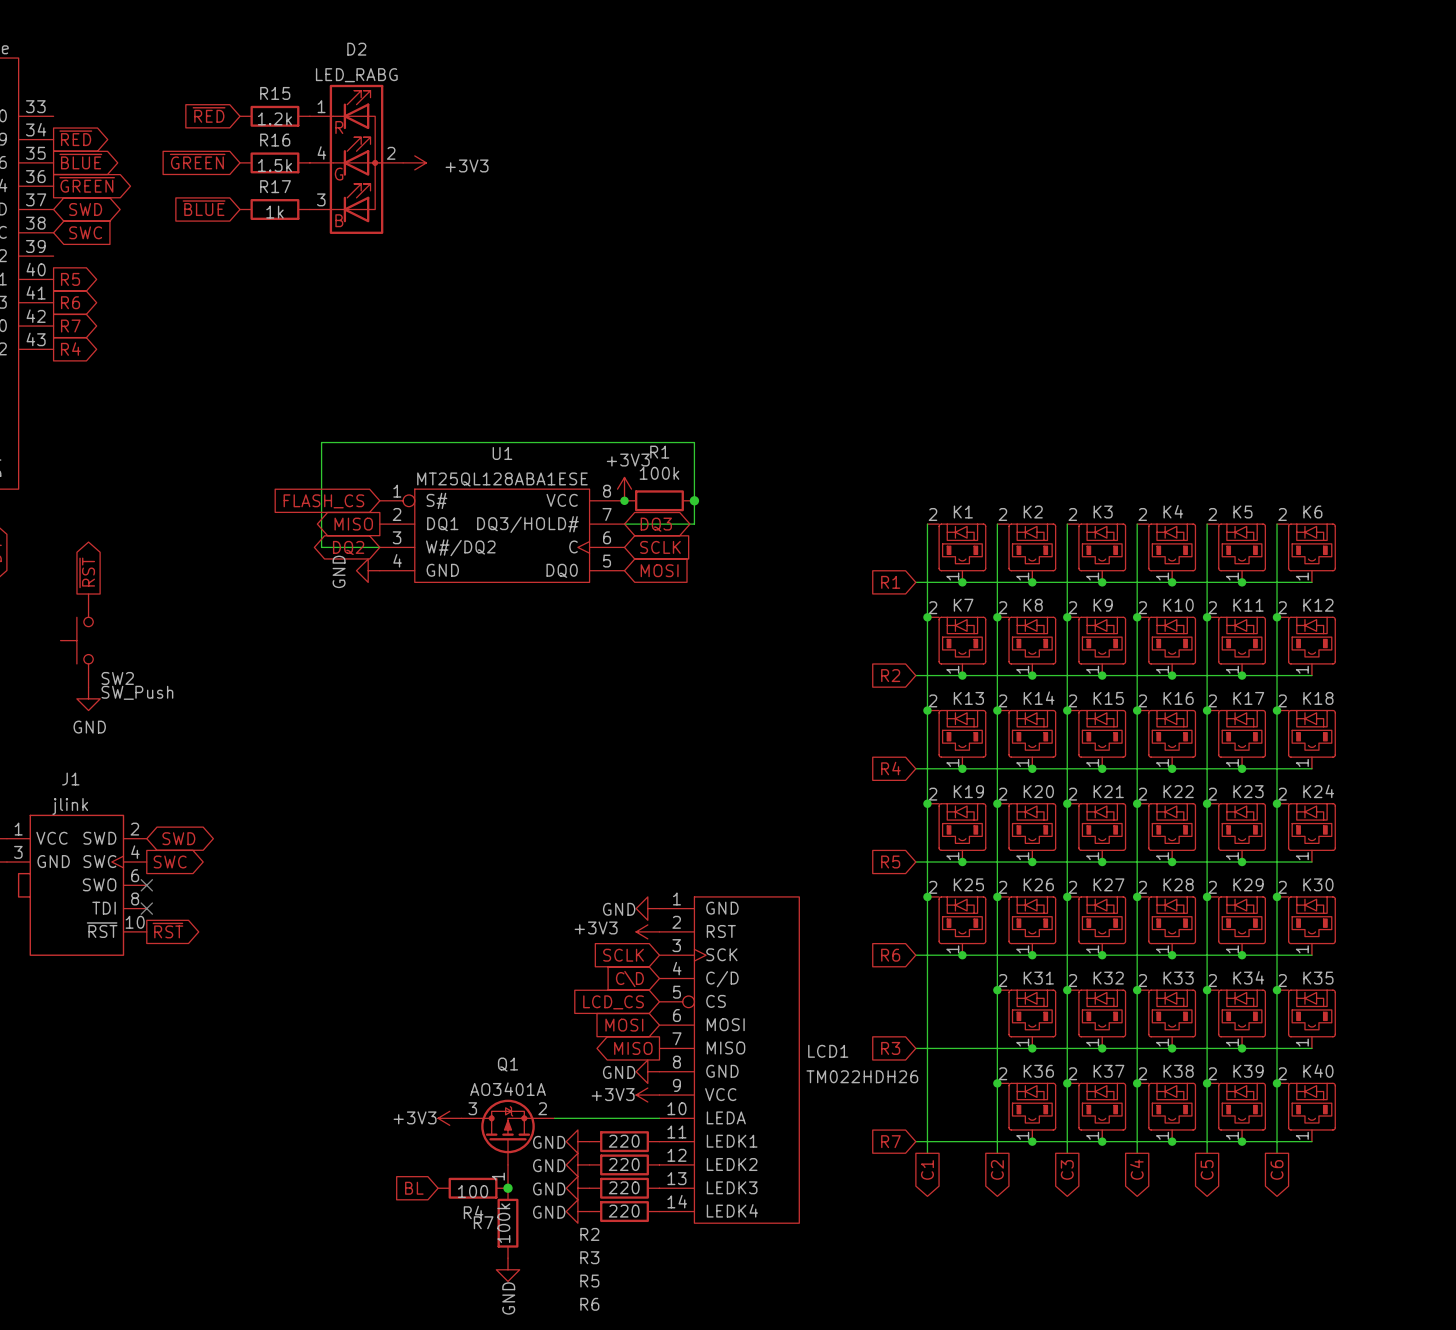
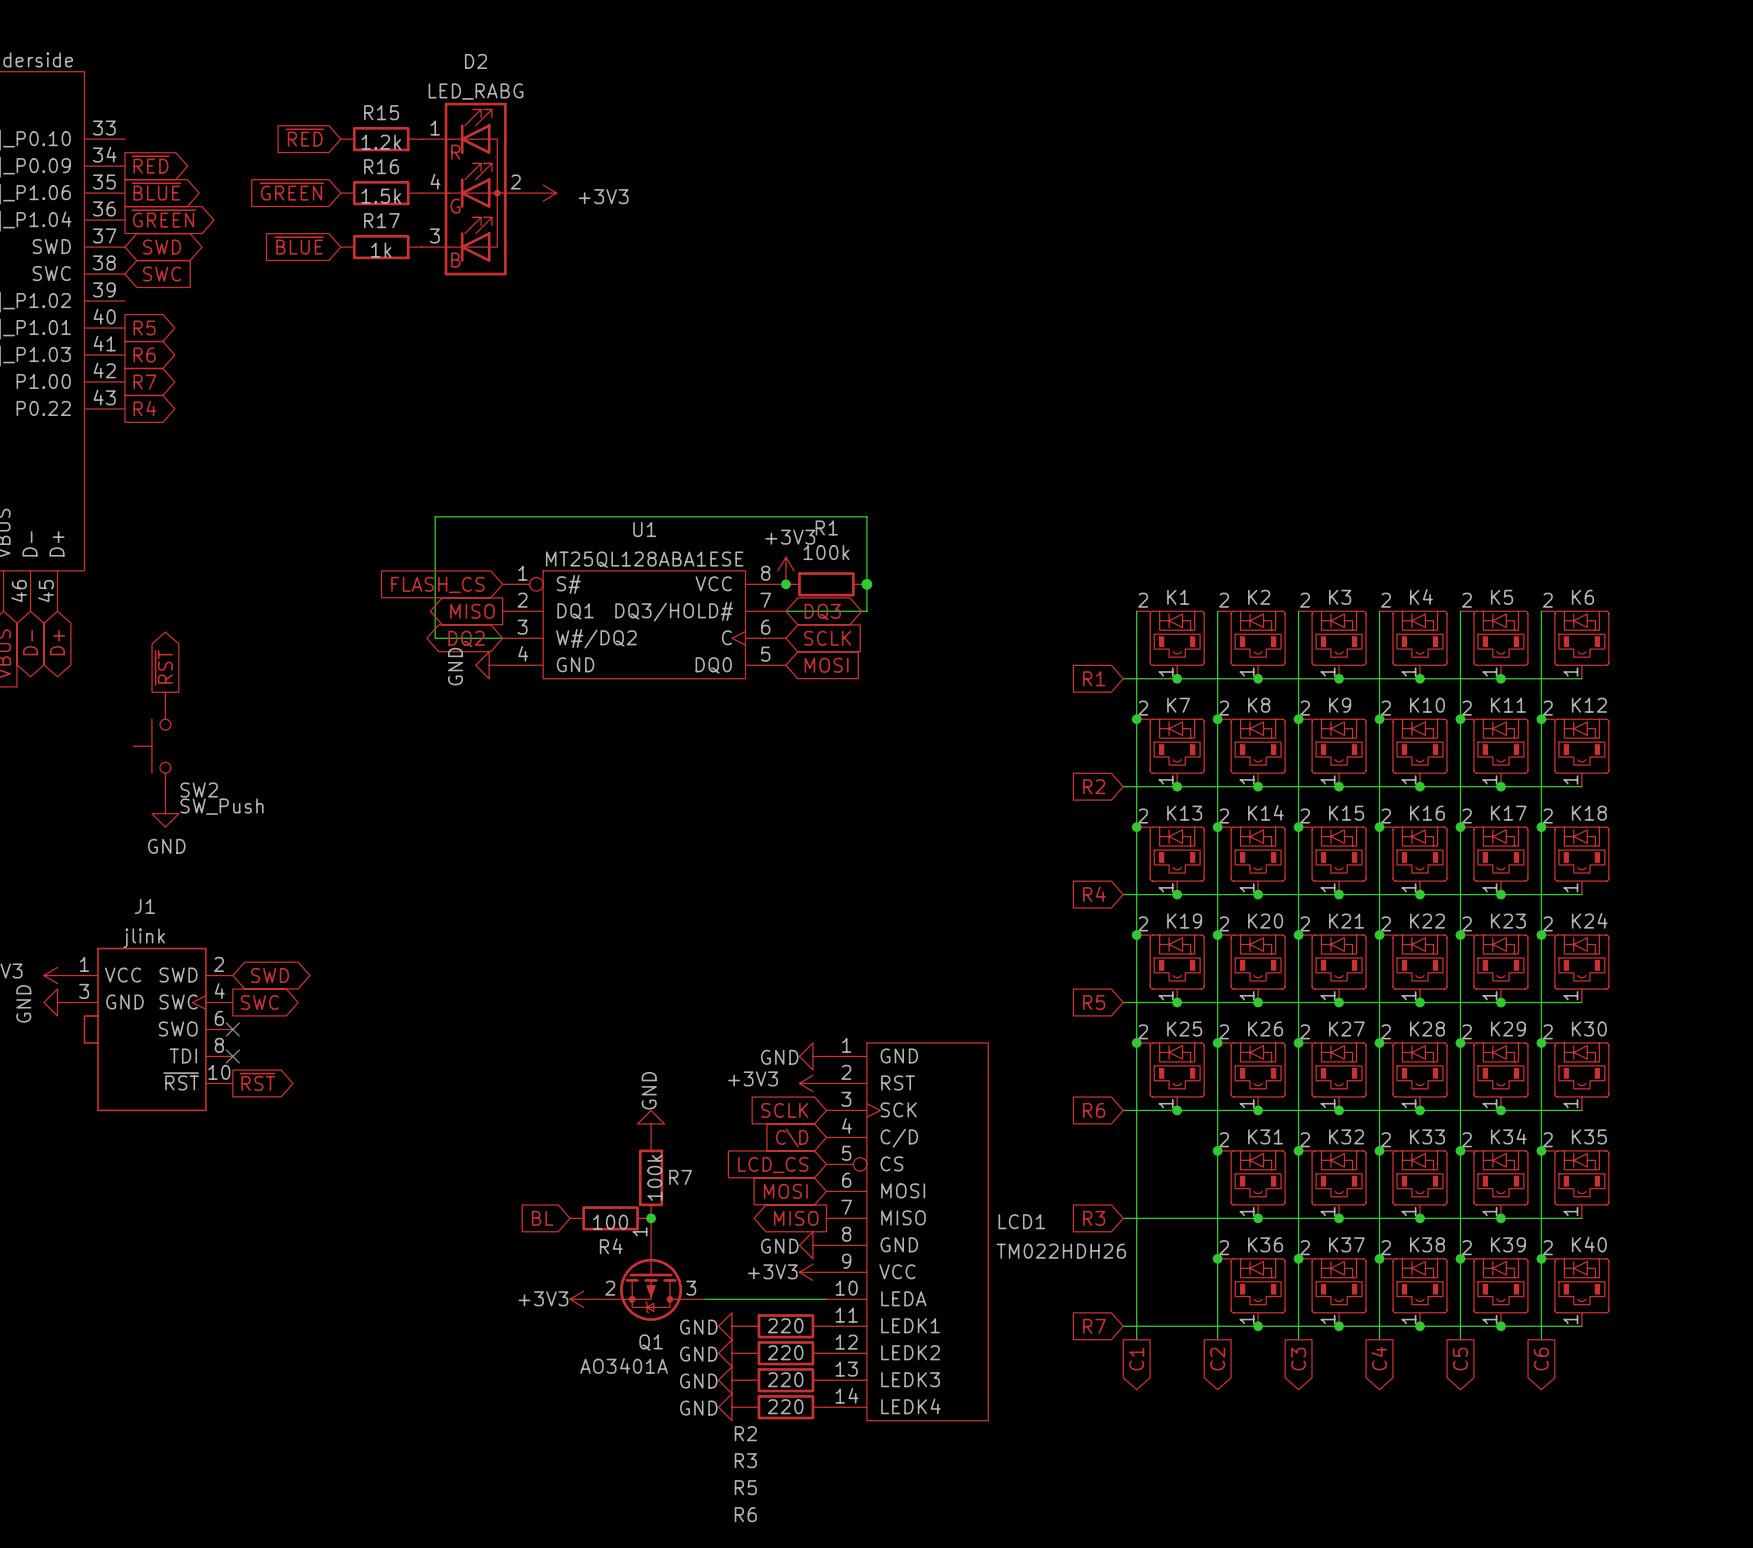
power symbol: none -> GND (651, 1123)
junction: none -> (651, 1218)
Q1 value position: AO3401A (508, 1089) -> AO3401A (624, 1365)
Q1 rotation: 0° (508, 1132) -> 180° (651, 1283)
global label position: BL (414, 1188) -> BL (542, 1218)
R4 position: (473, 1188) -> (610, 1218)
junction: (508, 1188) -> none
R7 name position: R7 (483, 1222) -> R7 (680, 1177)
R7 value position: 100k (503, 1223) -> 100k (654, 1177)
R7 position: (508, 1223) -> (651, 1177)
power symbol: GND (508, 1269) -> none

